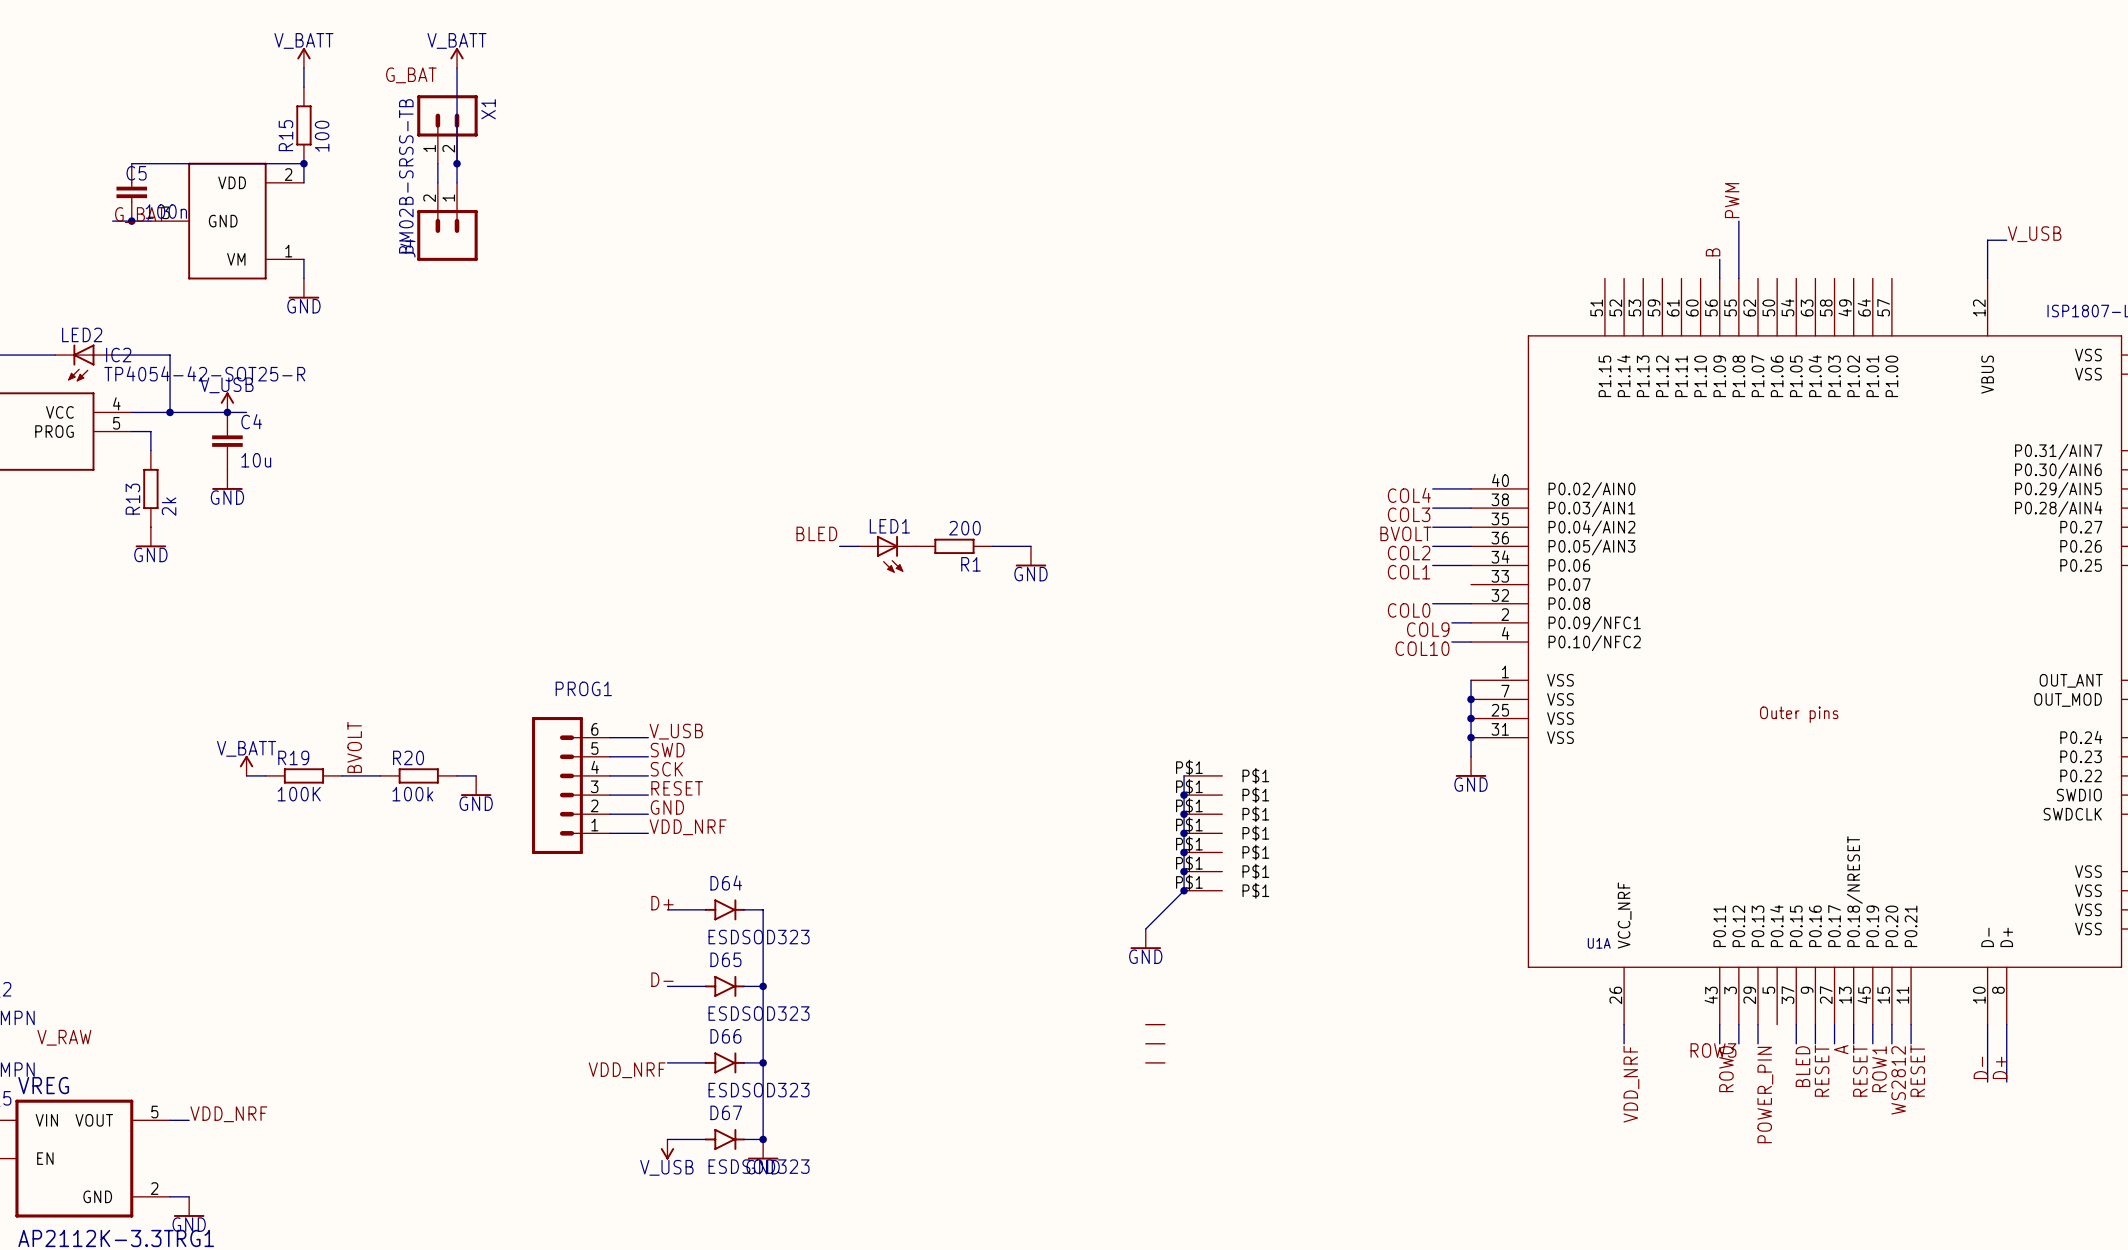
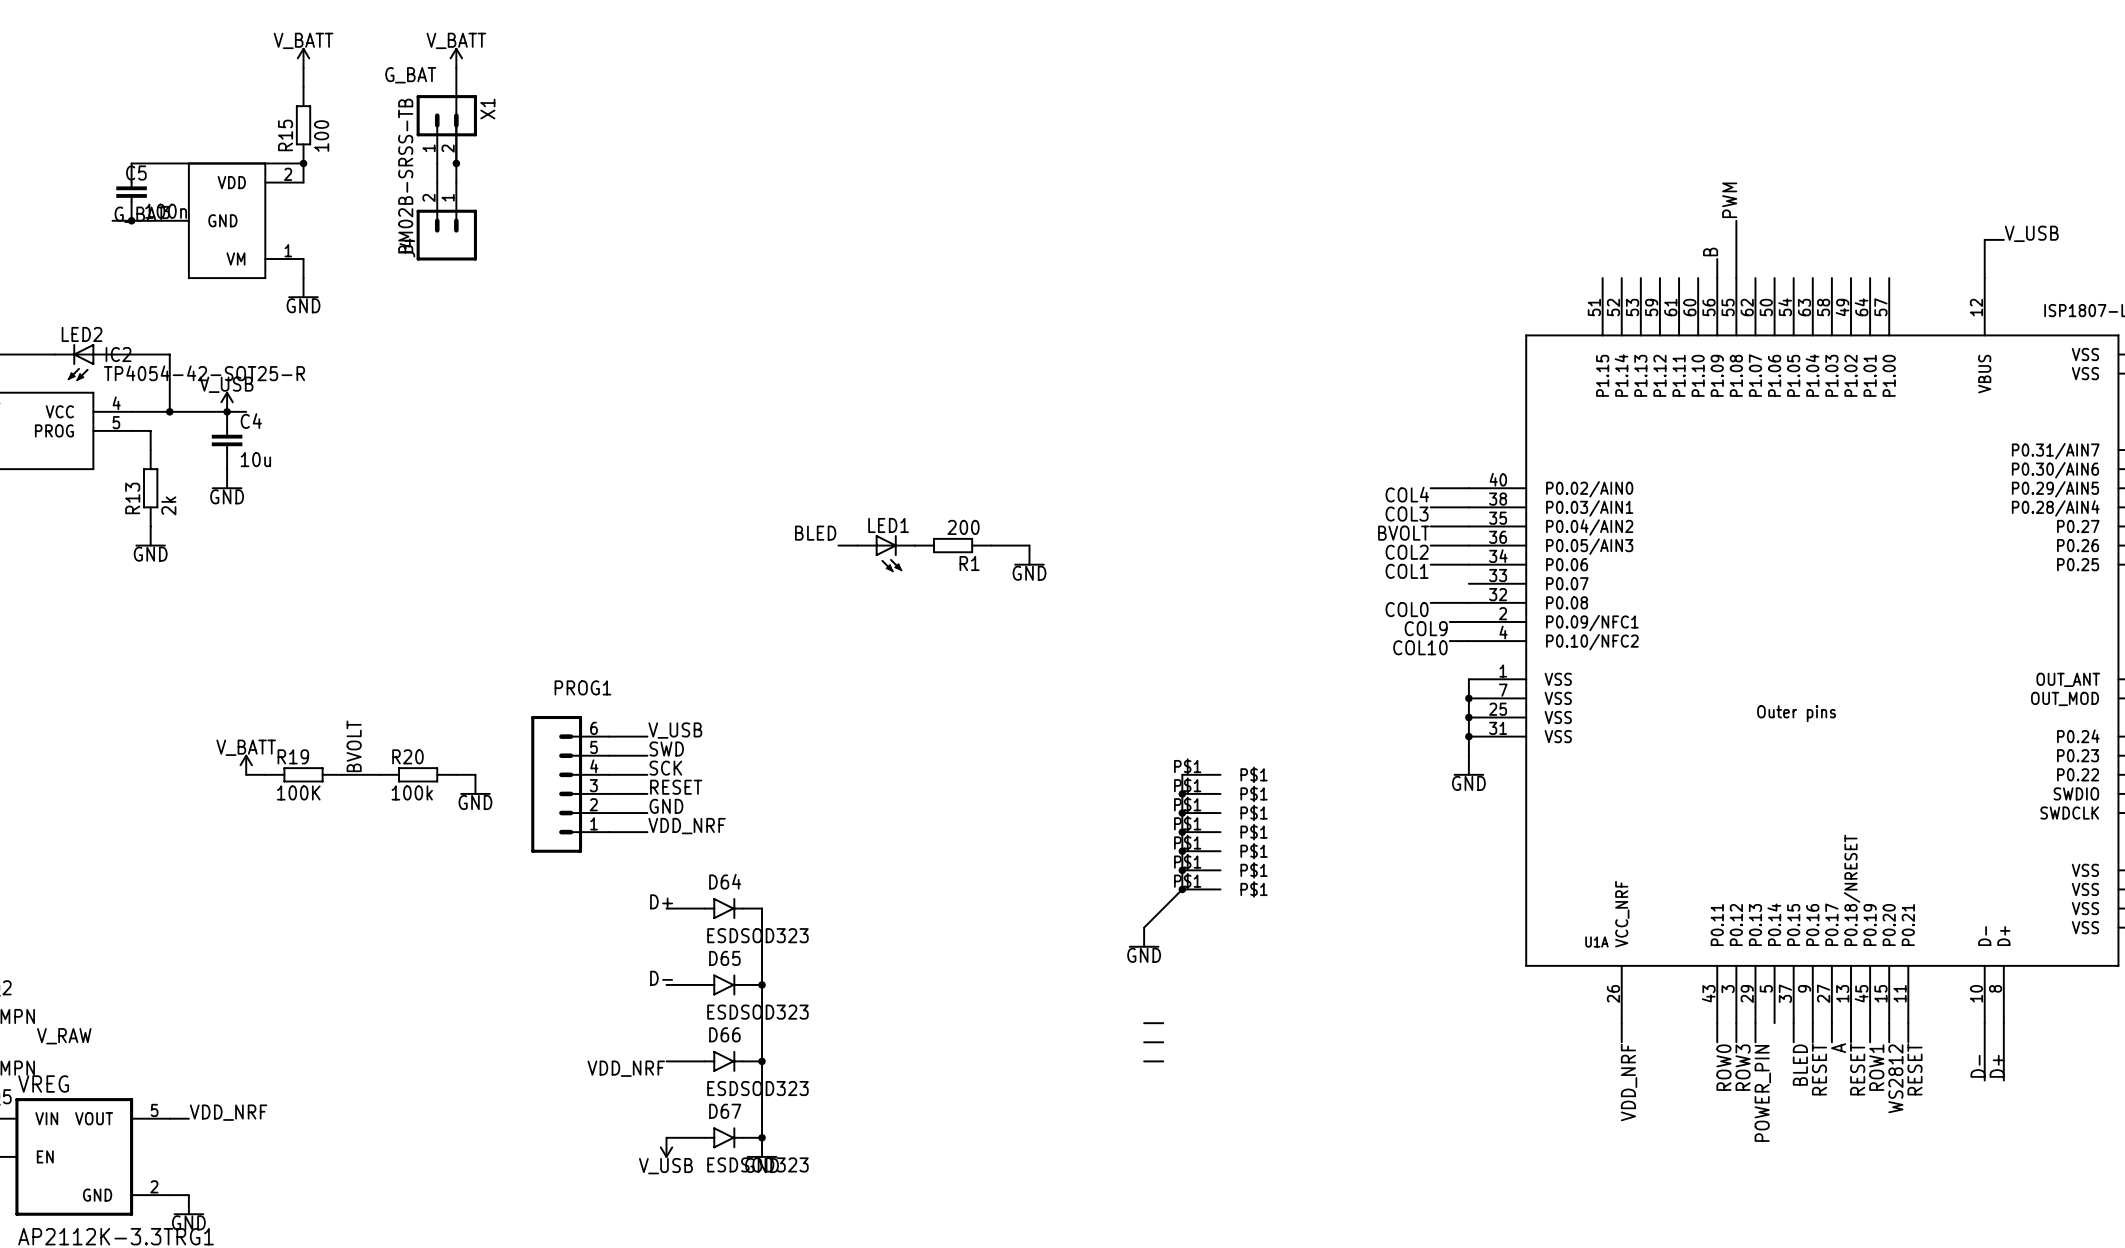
label rotation: 0° (1713, 1050) -> 90° counterclockwise (1743, 1067)

